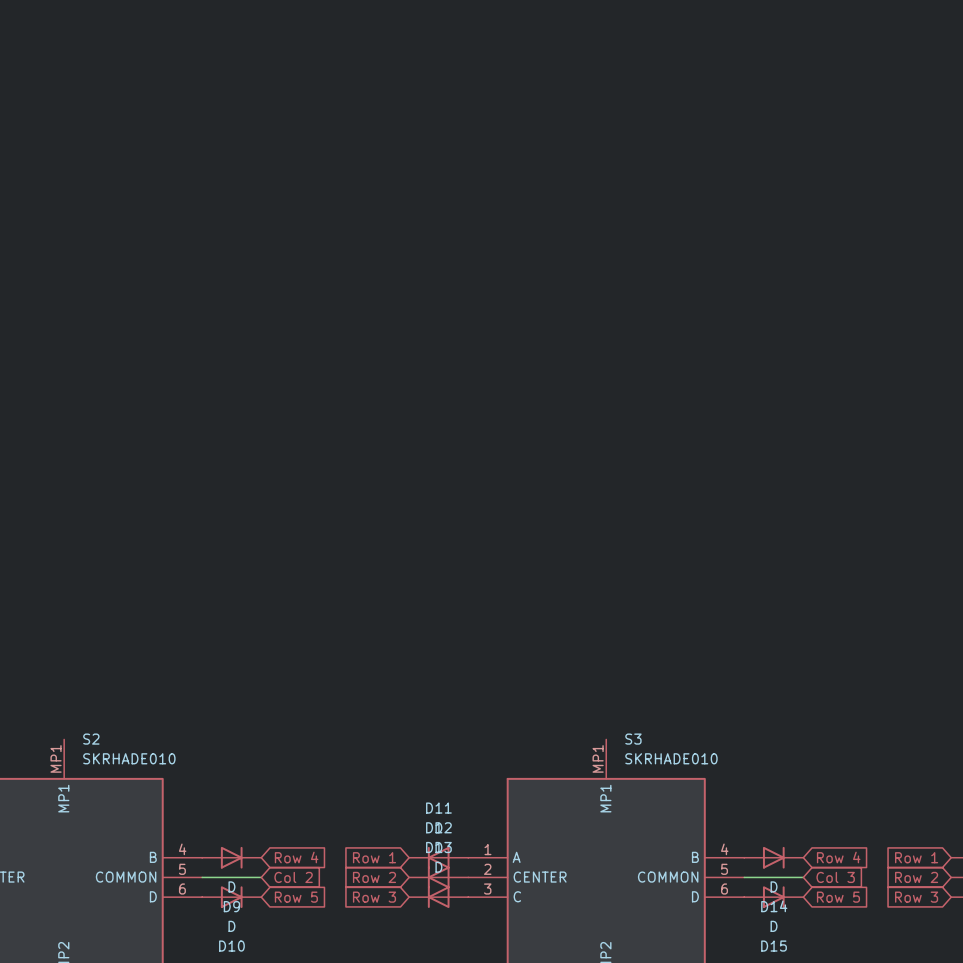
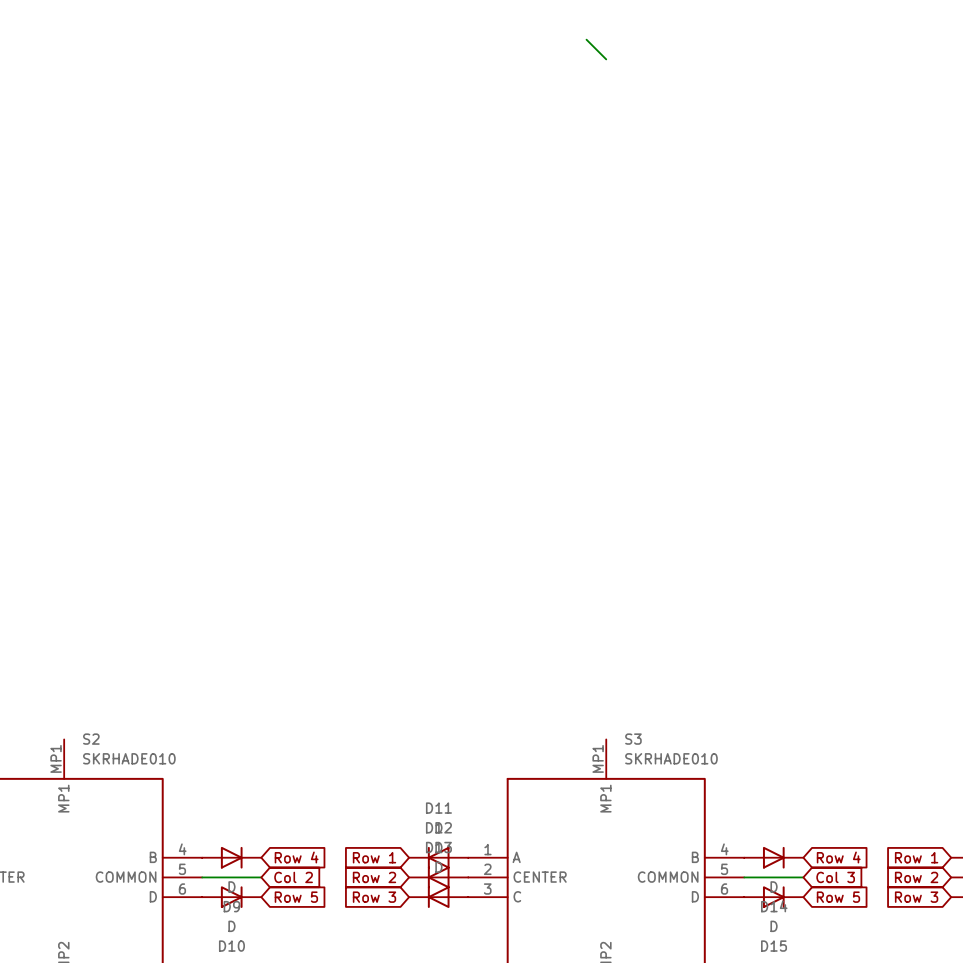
wire: none -> (586, 39) (606, 59)

